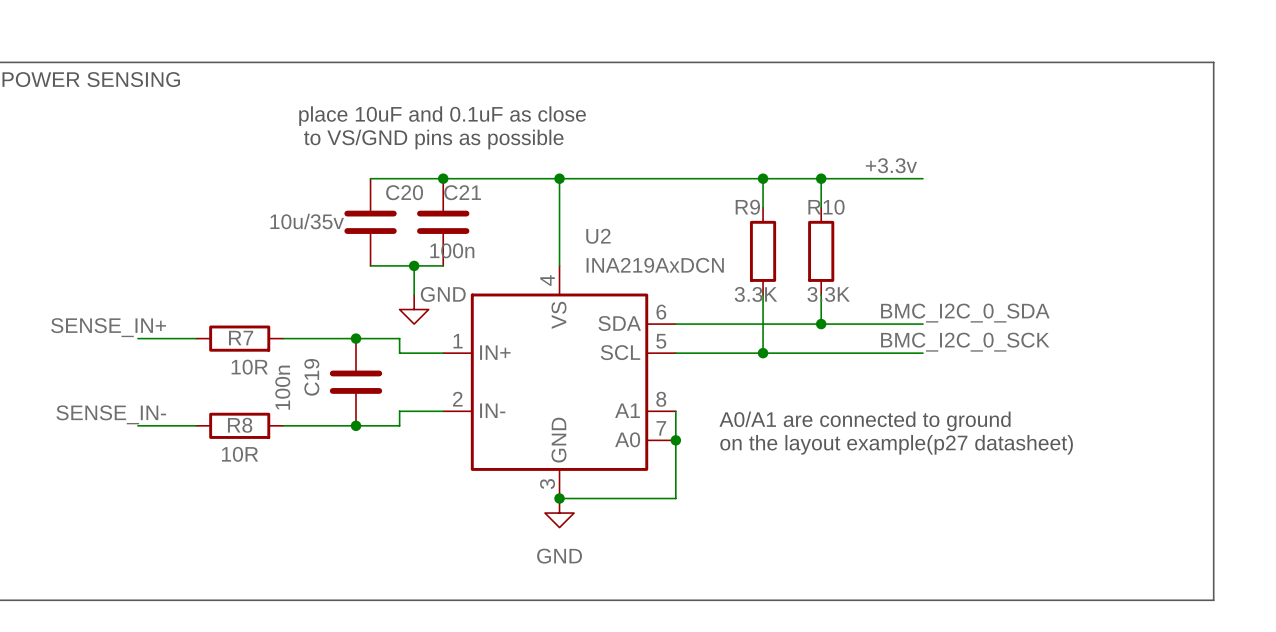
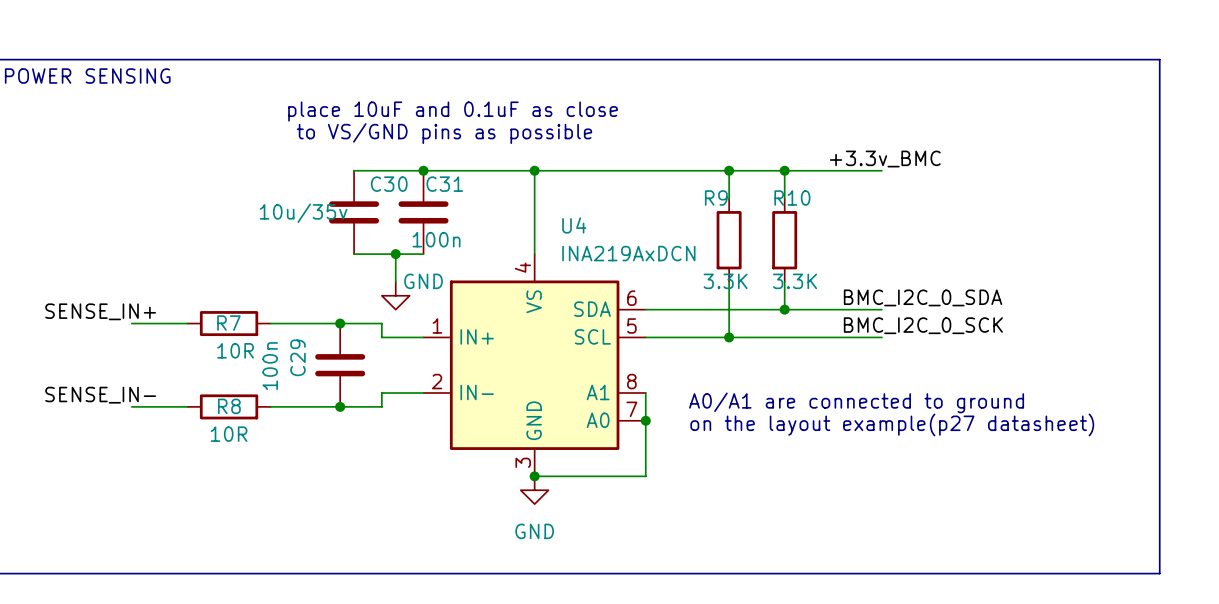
label: +3.3v (891, 165) -> +3.3v_BMC (885, 159)
C20 name: C20 (404, 192) -> C30 (389, 184)
C21 name: C21 (462, 192) -> C31 (444, 184)
U2 name: U2 (598, 236) -> U4 (574, 225)
C19 name: C19 (311, 377) -> C29 (297, 357)

